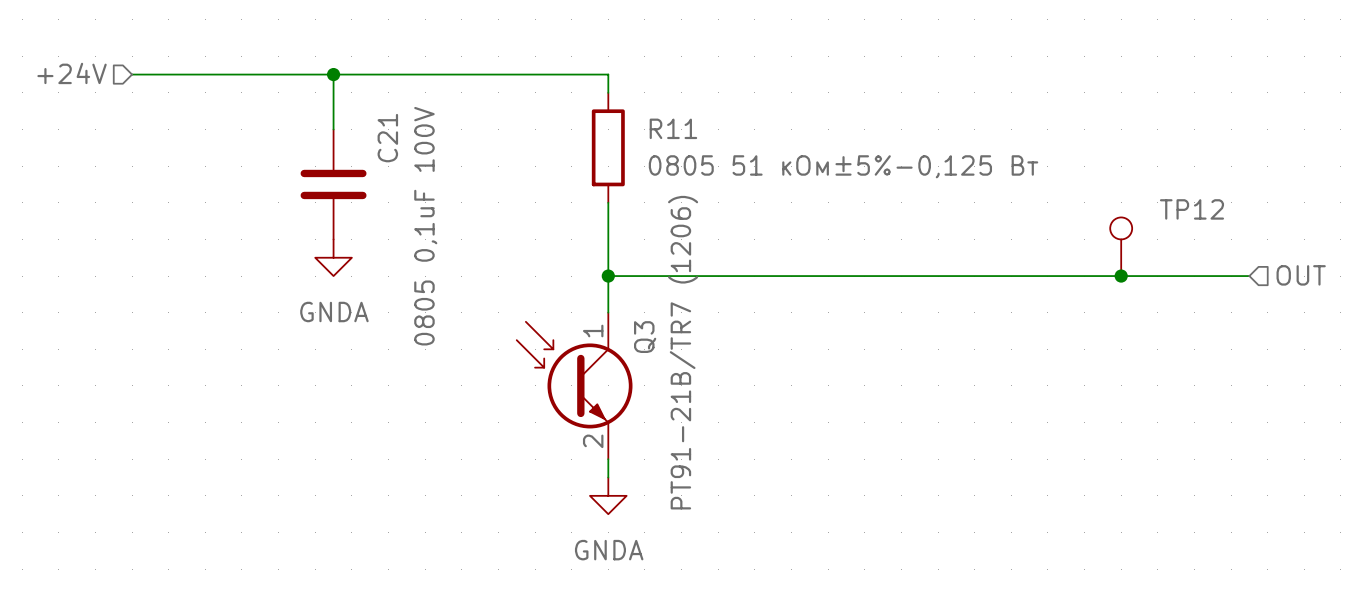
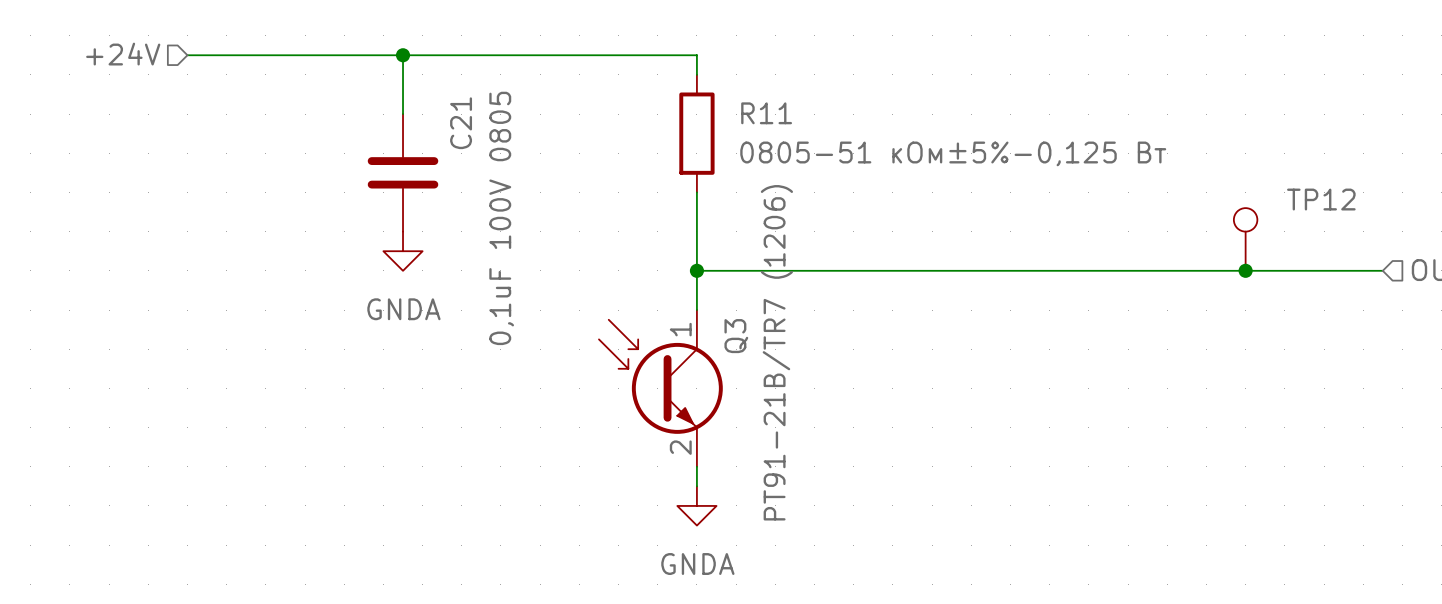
R11 value: 0805 51 кОм±5%-0,125 Вт (843, 166) -> 0805-51 кОм±5%-0,125 Вт (953, 153)
C21 value: 0805 0,1uF 100V (425, 226) -> 0,1uF 100V 0805 (501, 218)

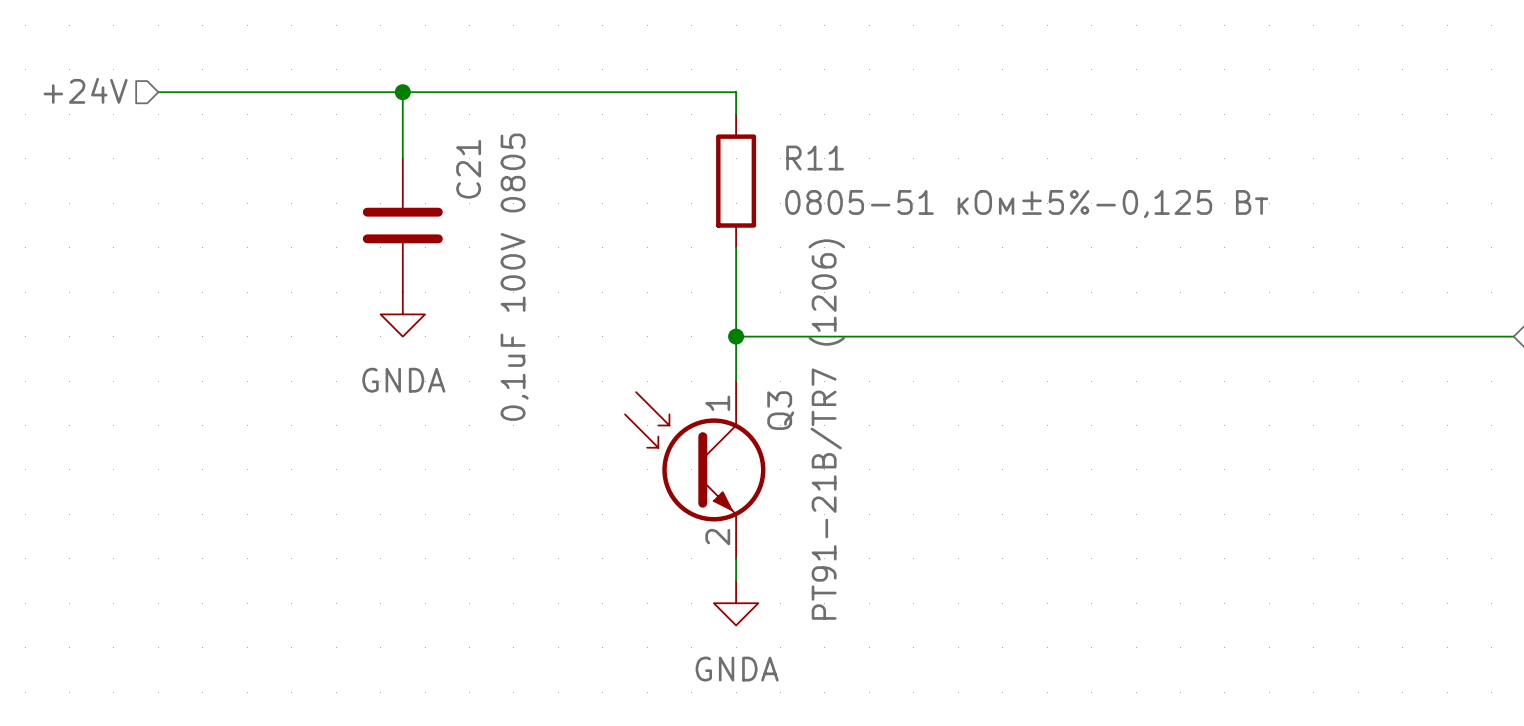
TP12: (1245, 239) -> none
junction: (1245, 270) -> none

